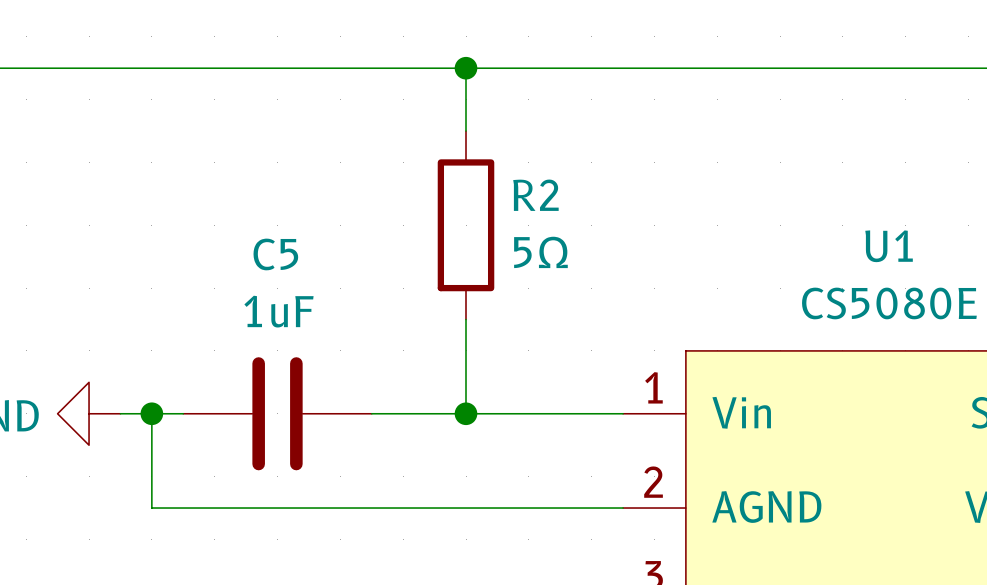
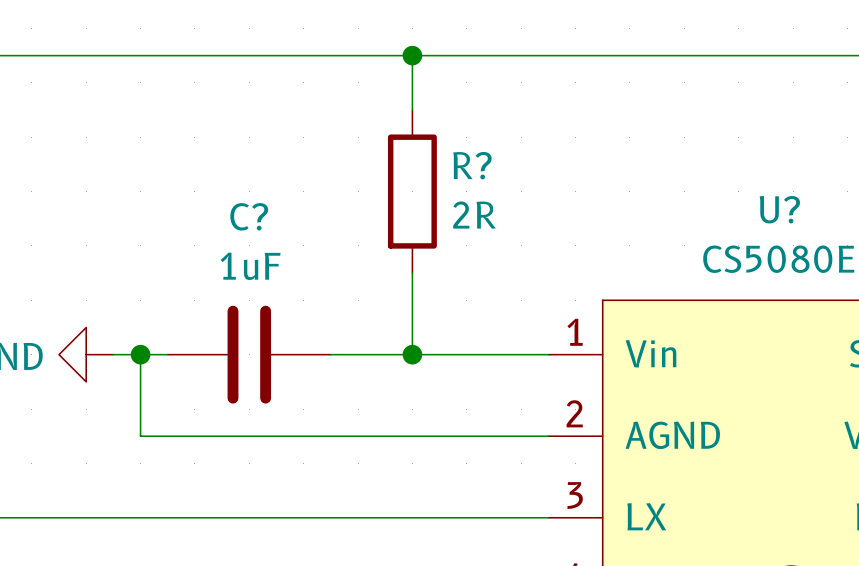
R2 name: R2 (535, 195) -> R? (472, 165)
U1 name: U1 (889, 246) -> U? (779, 209)
R2 value: 5Ω (540, 252) -> 2R (474, 215)
C5 name: C5 (275, 254) -> C? (249, 216)

